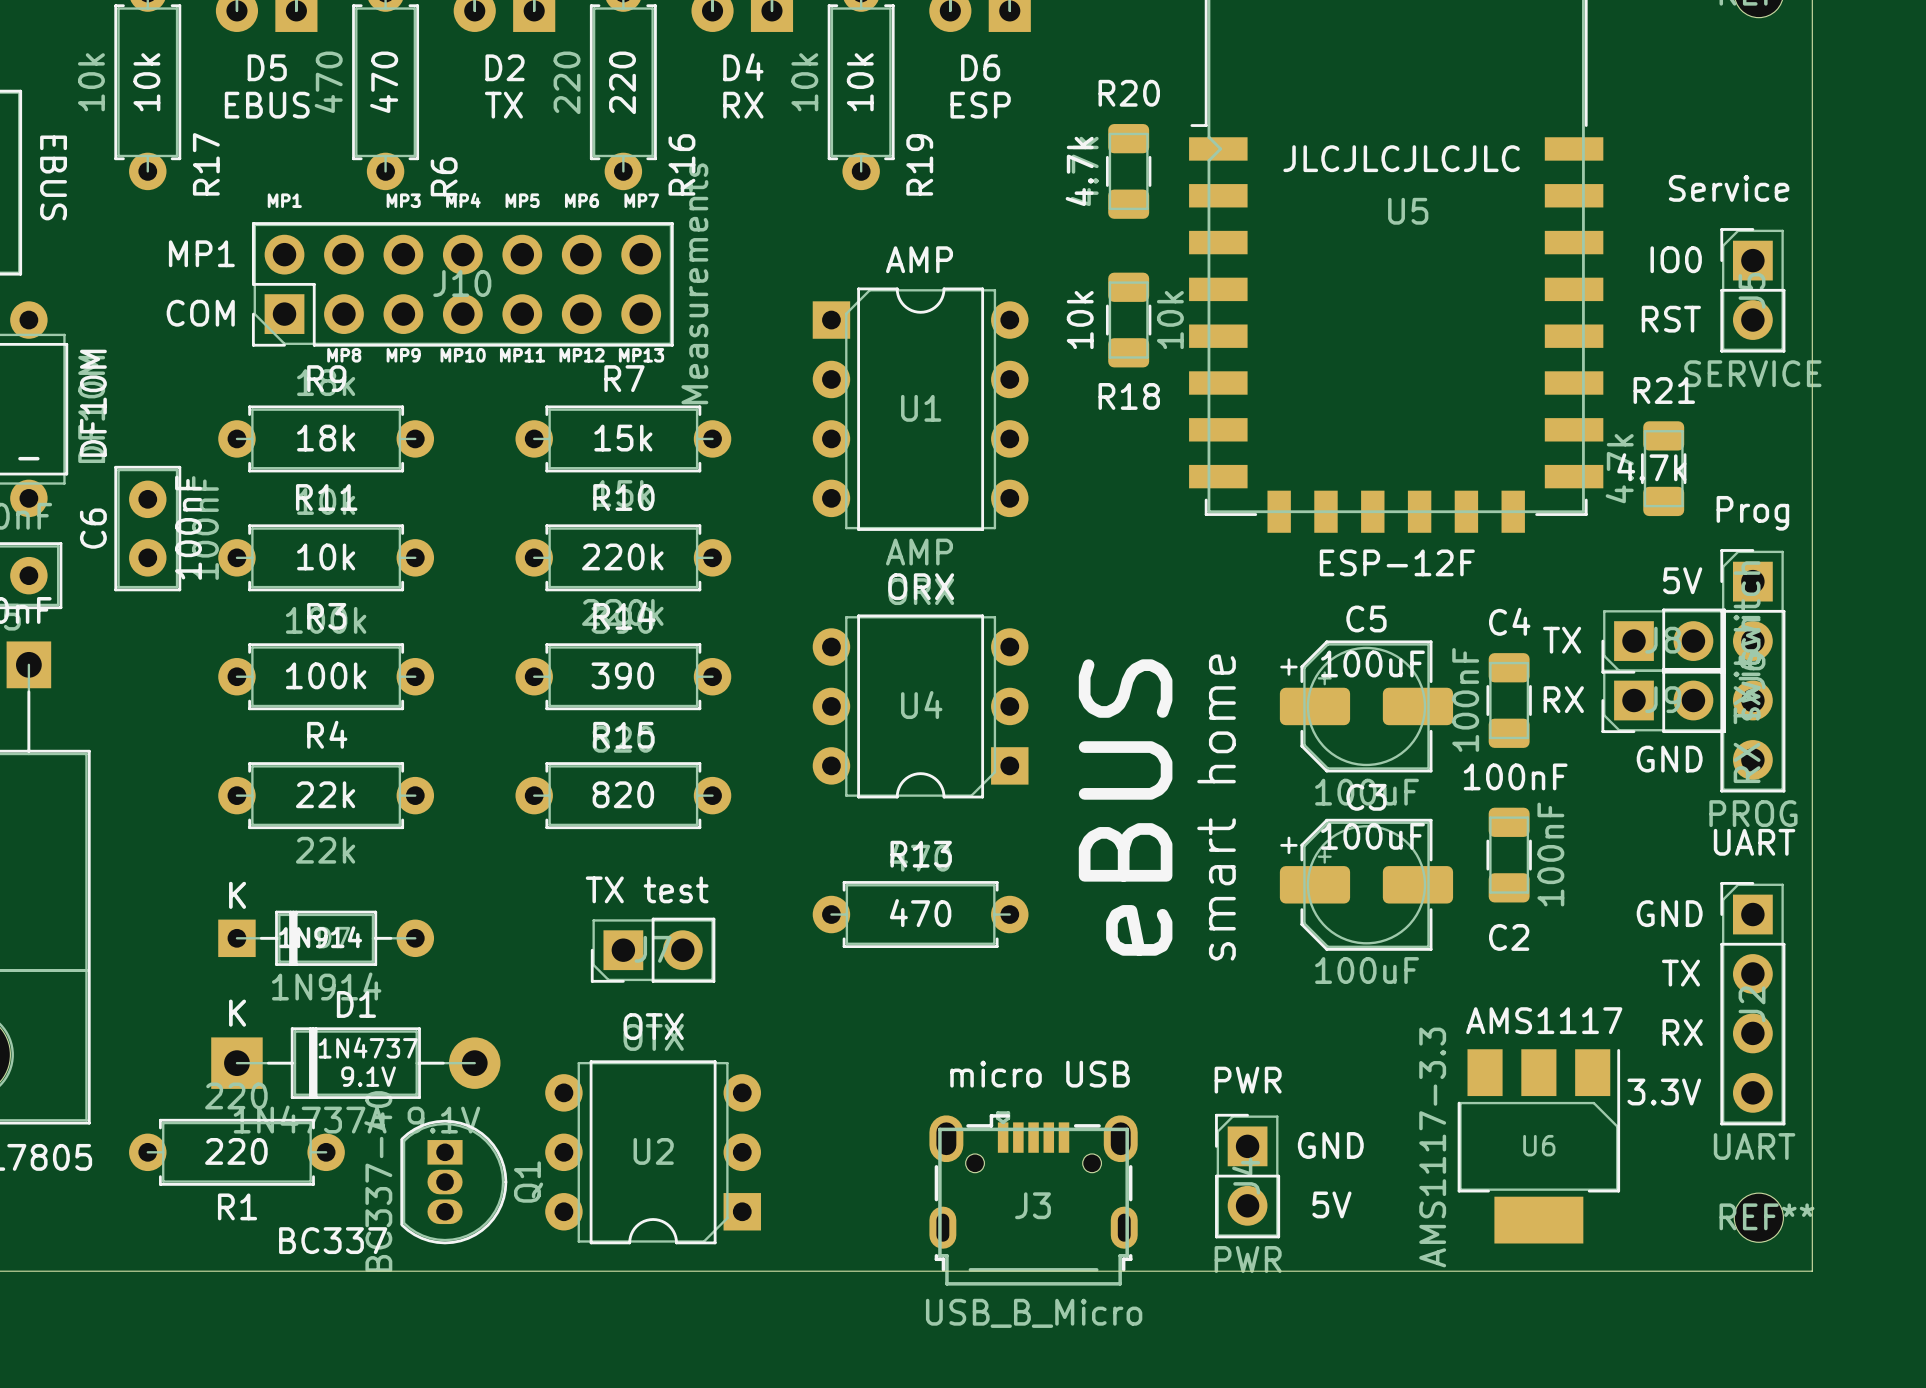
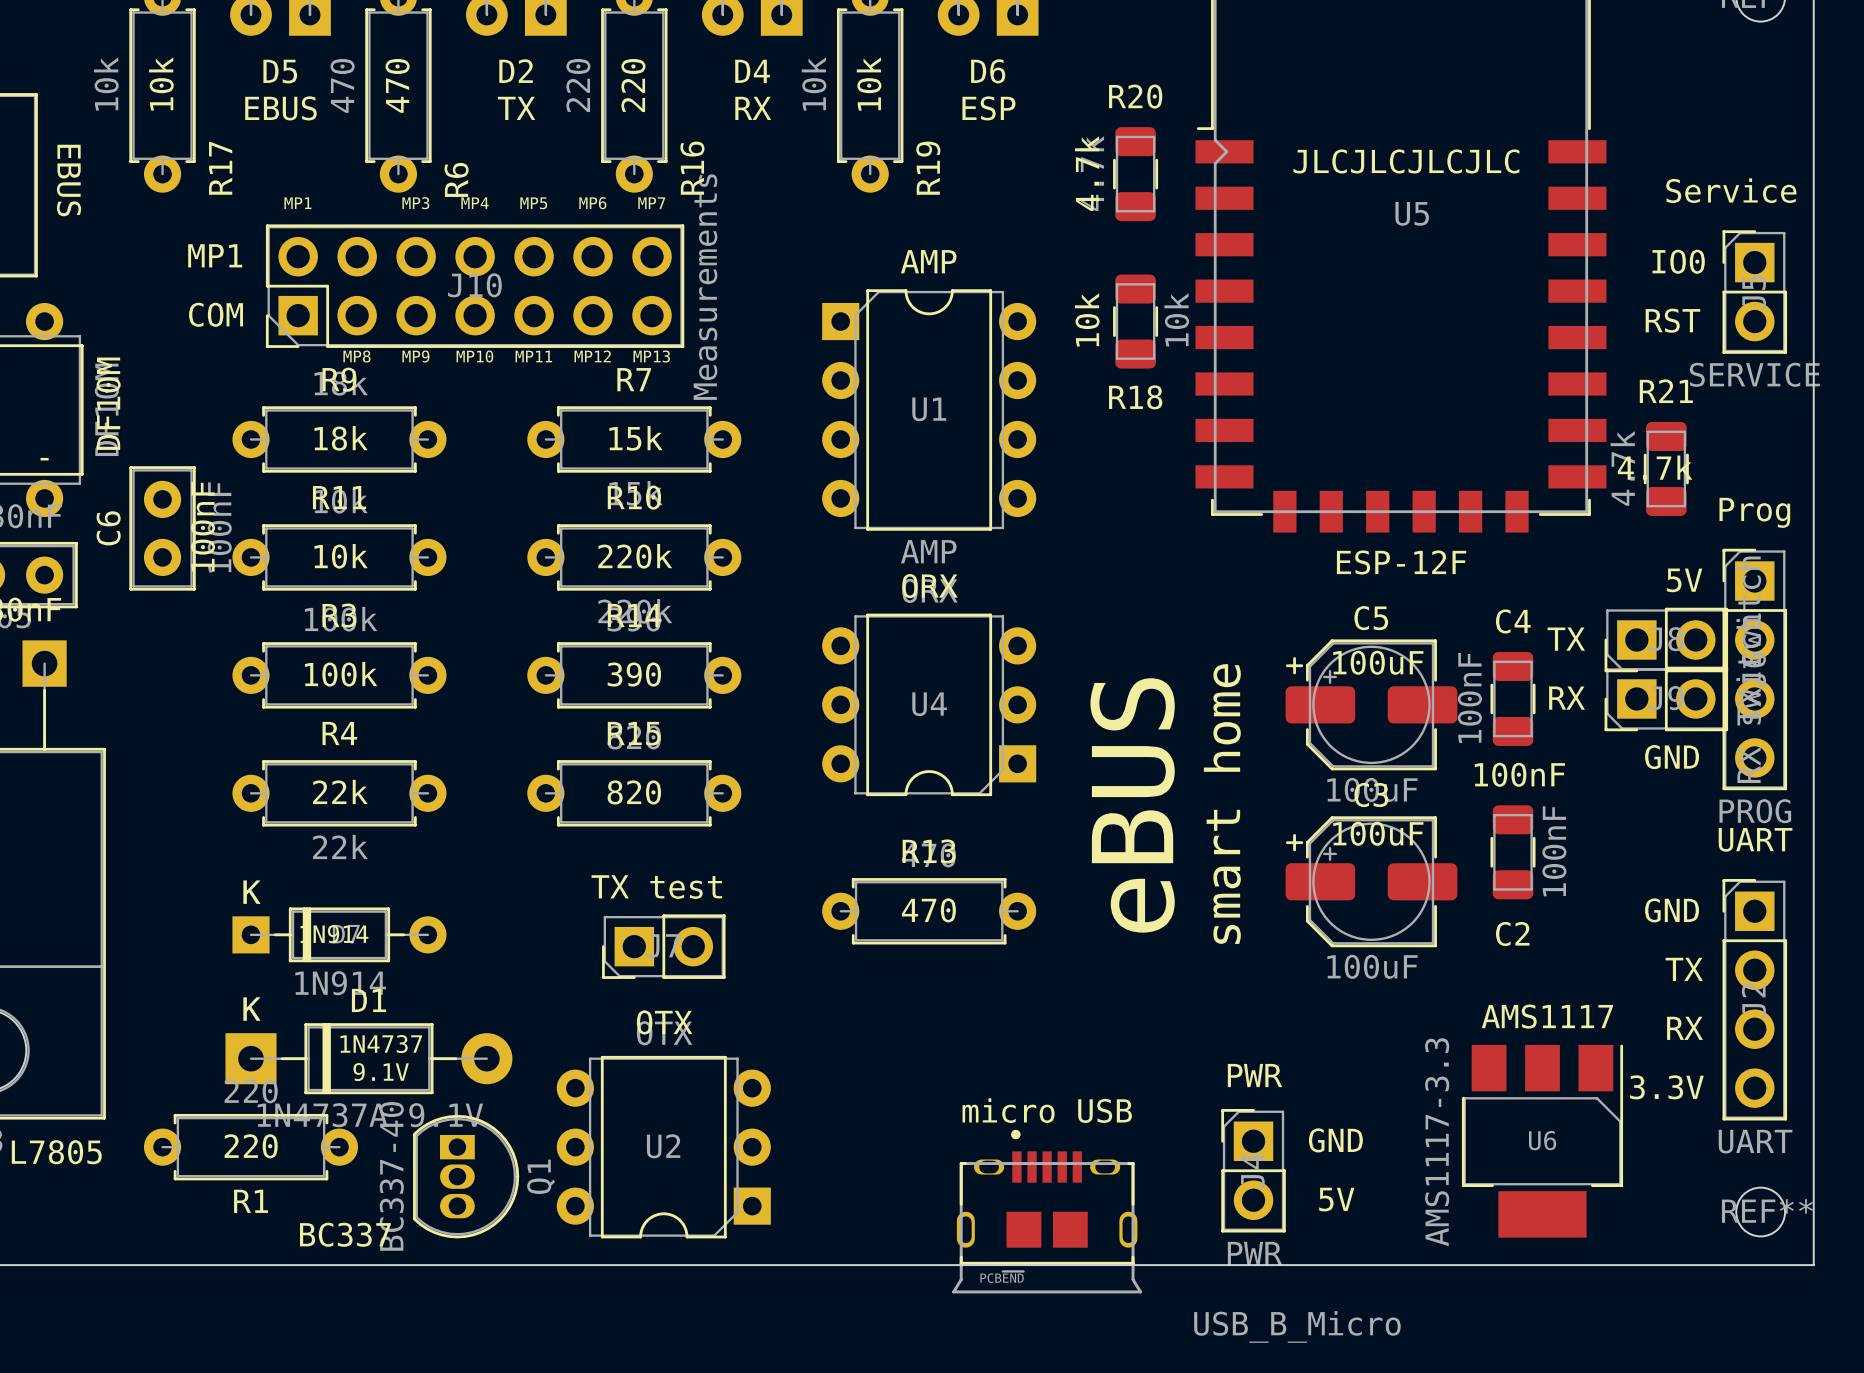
text position: micro USB (1040, 1074) -> micro USB (1047, 1110)
J3: USB_B_Micro (1033, 1198) -> none
part: none -> USB_B_Micro (1047, 1211)

